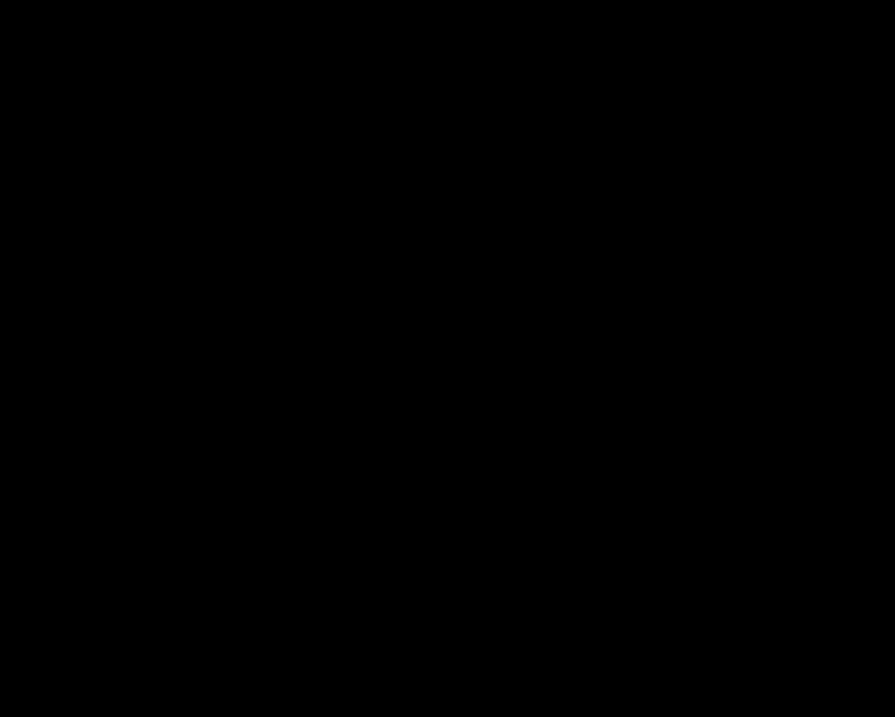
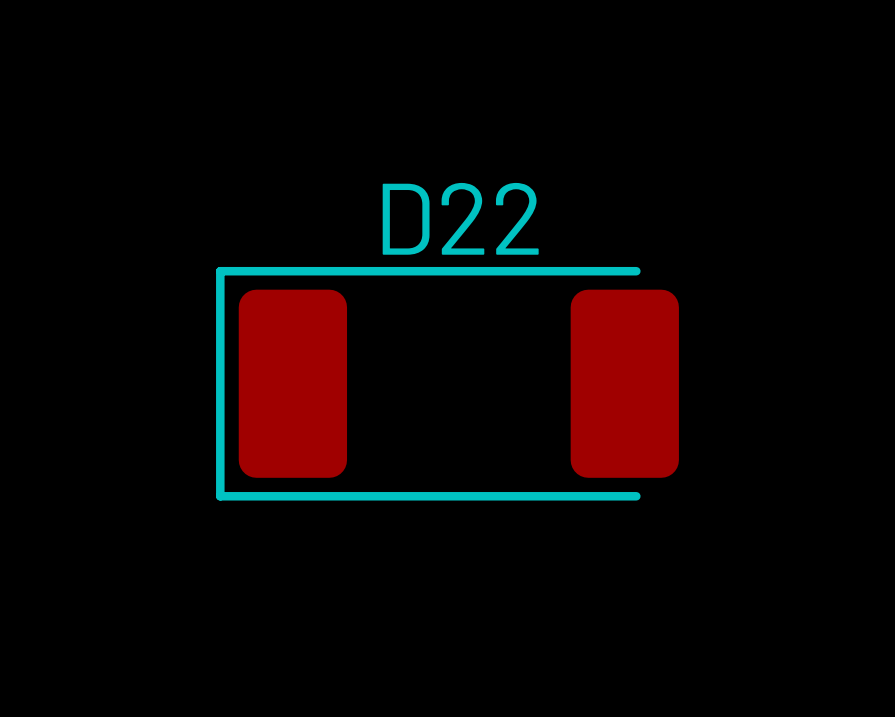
D22: none -> (447, 383)

